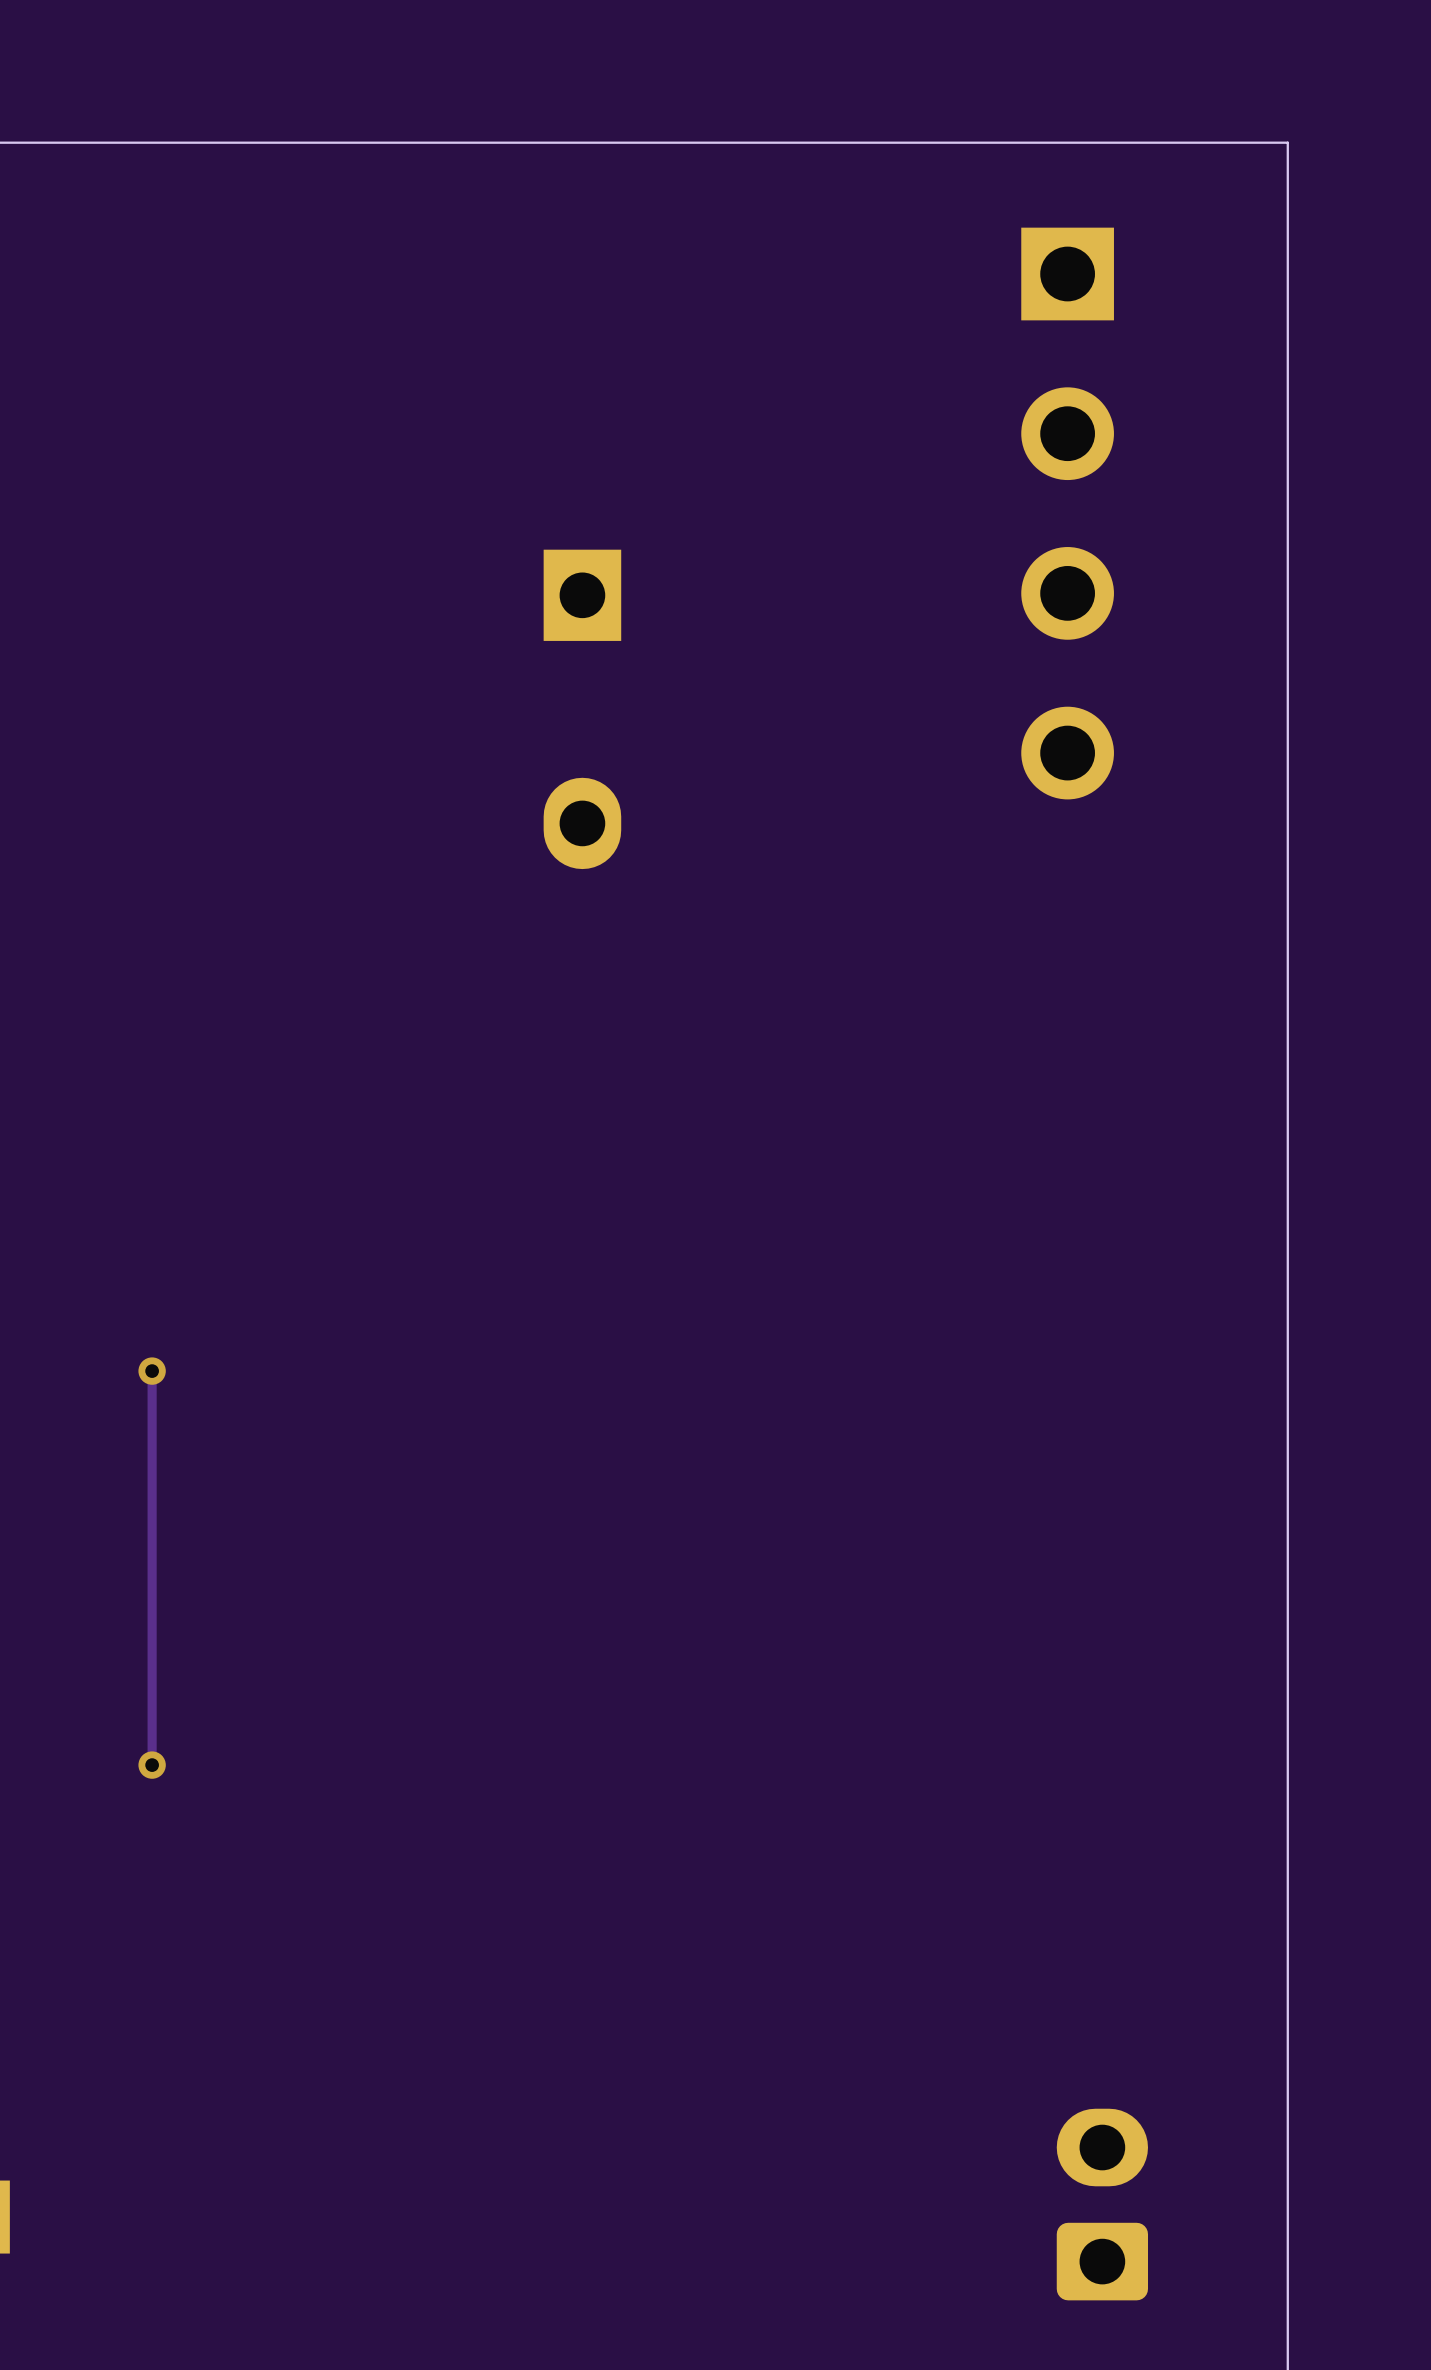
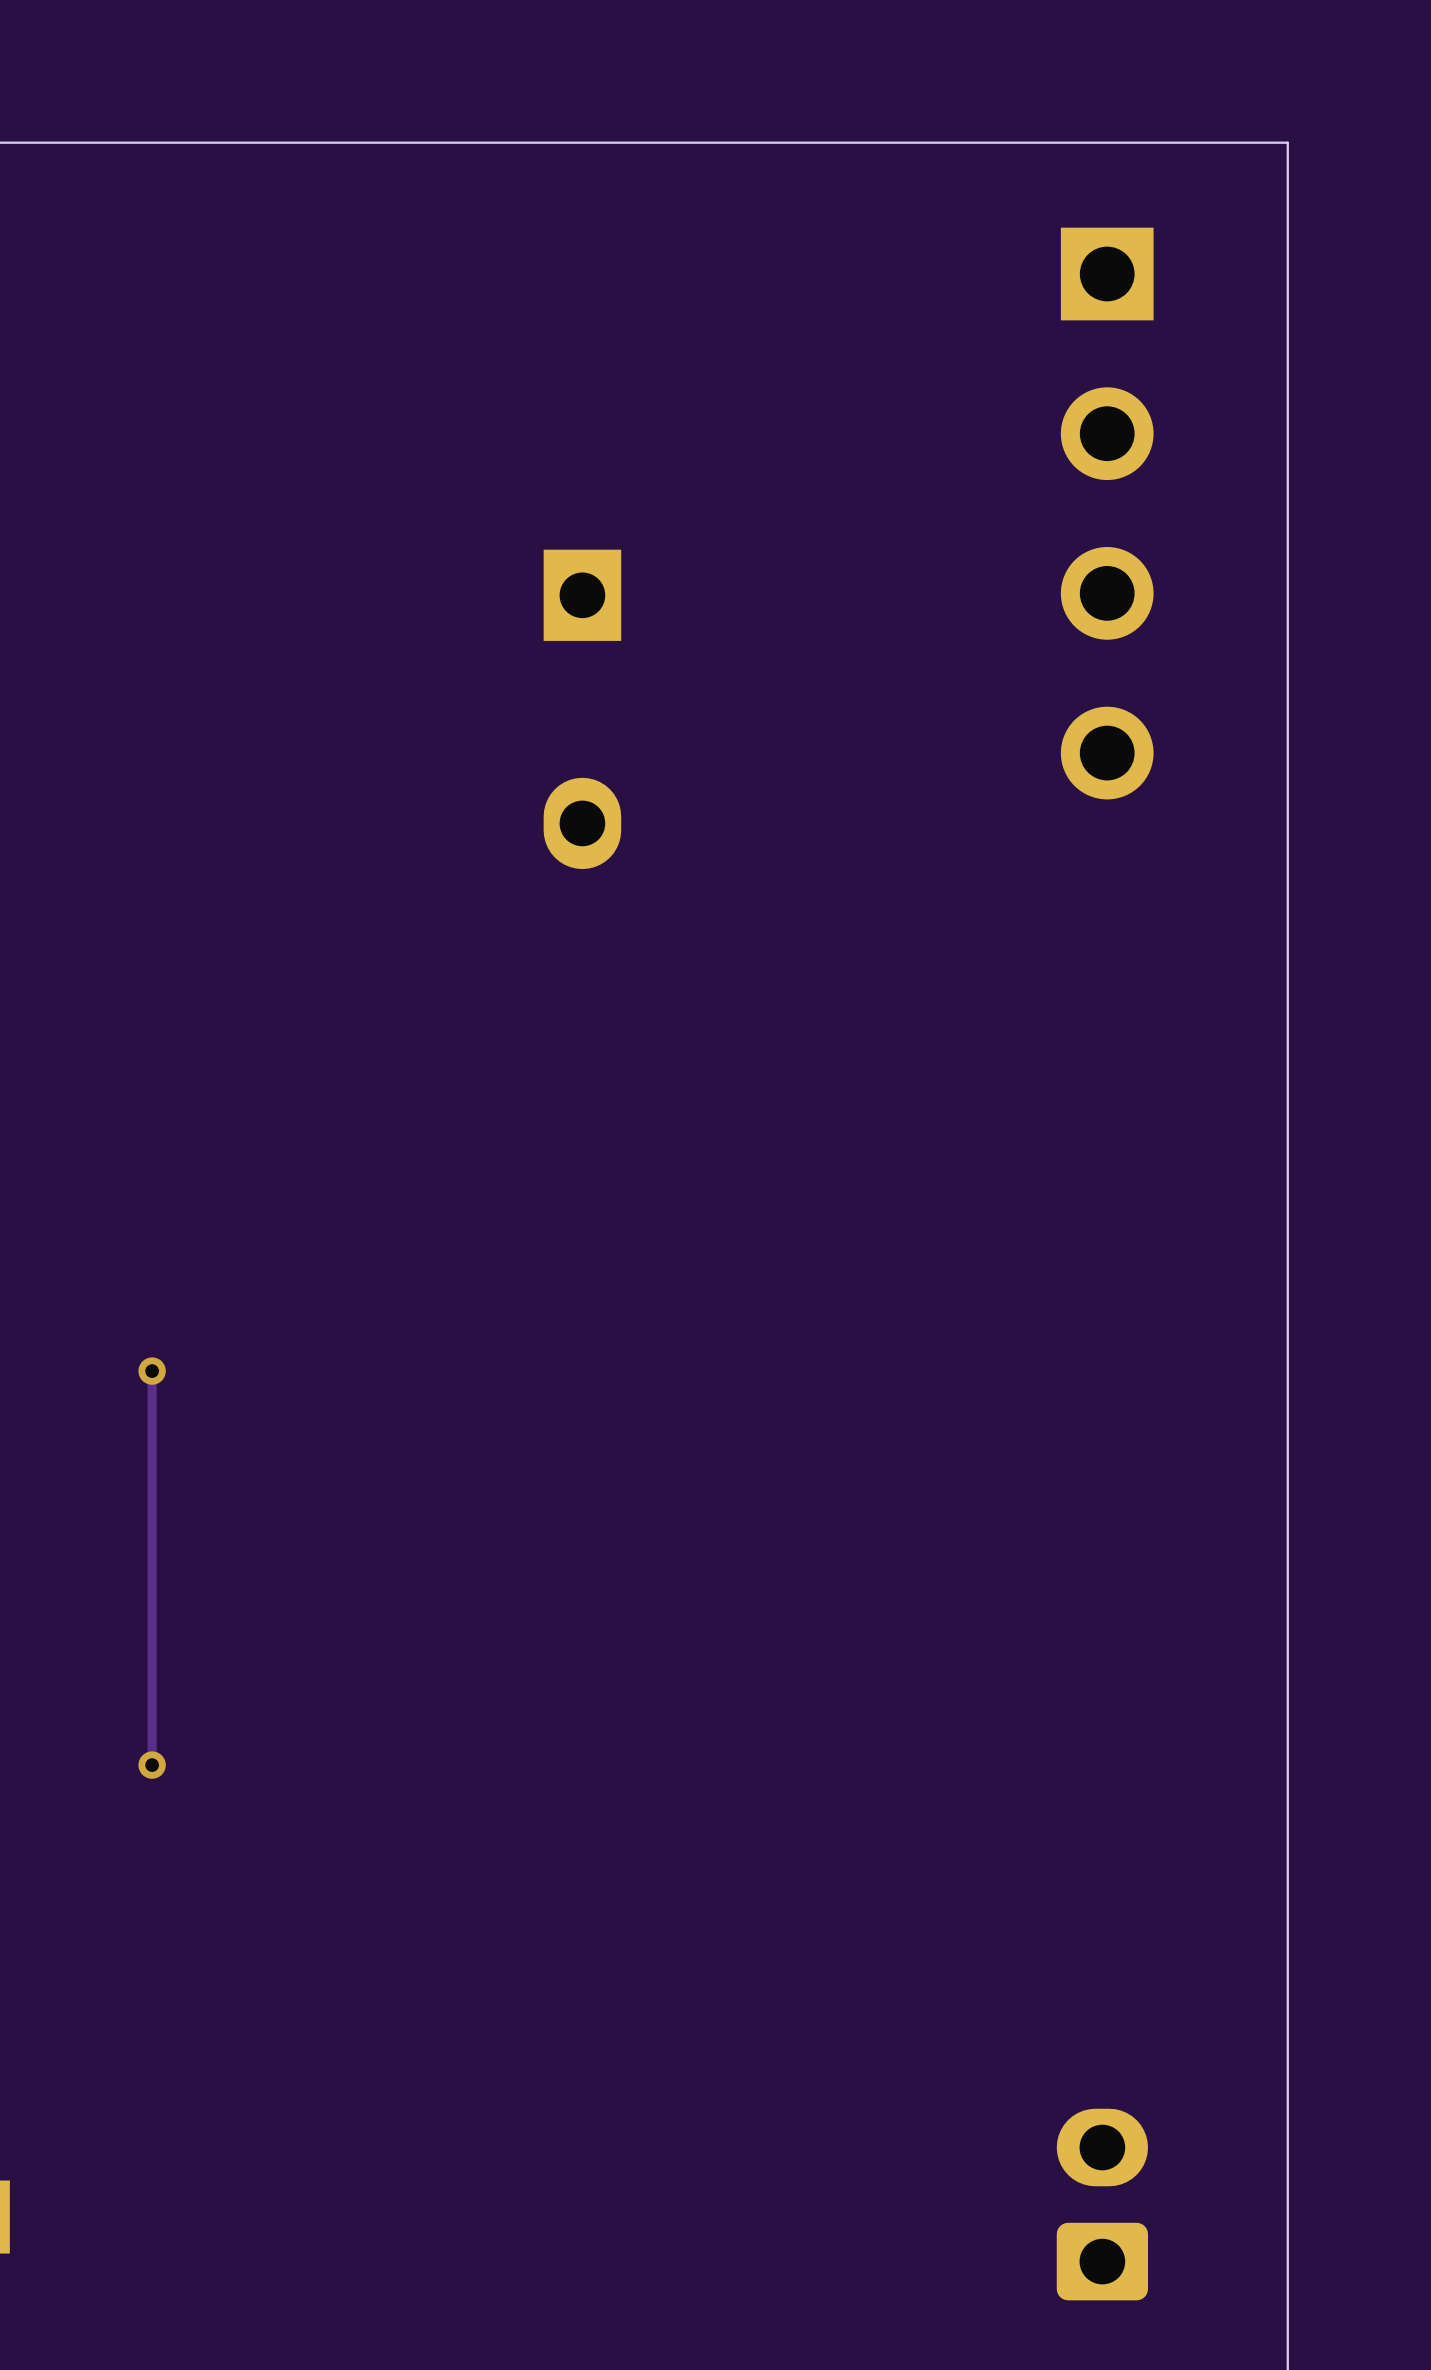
part position: (1067, 513) -> (1107, 513)

